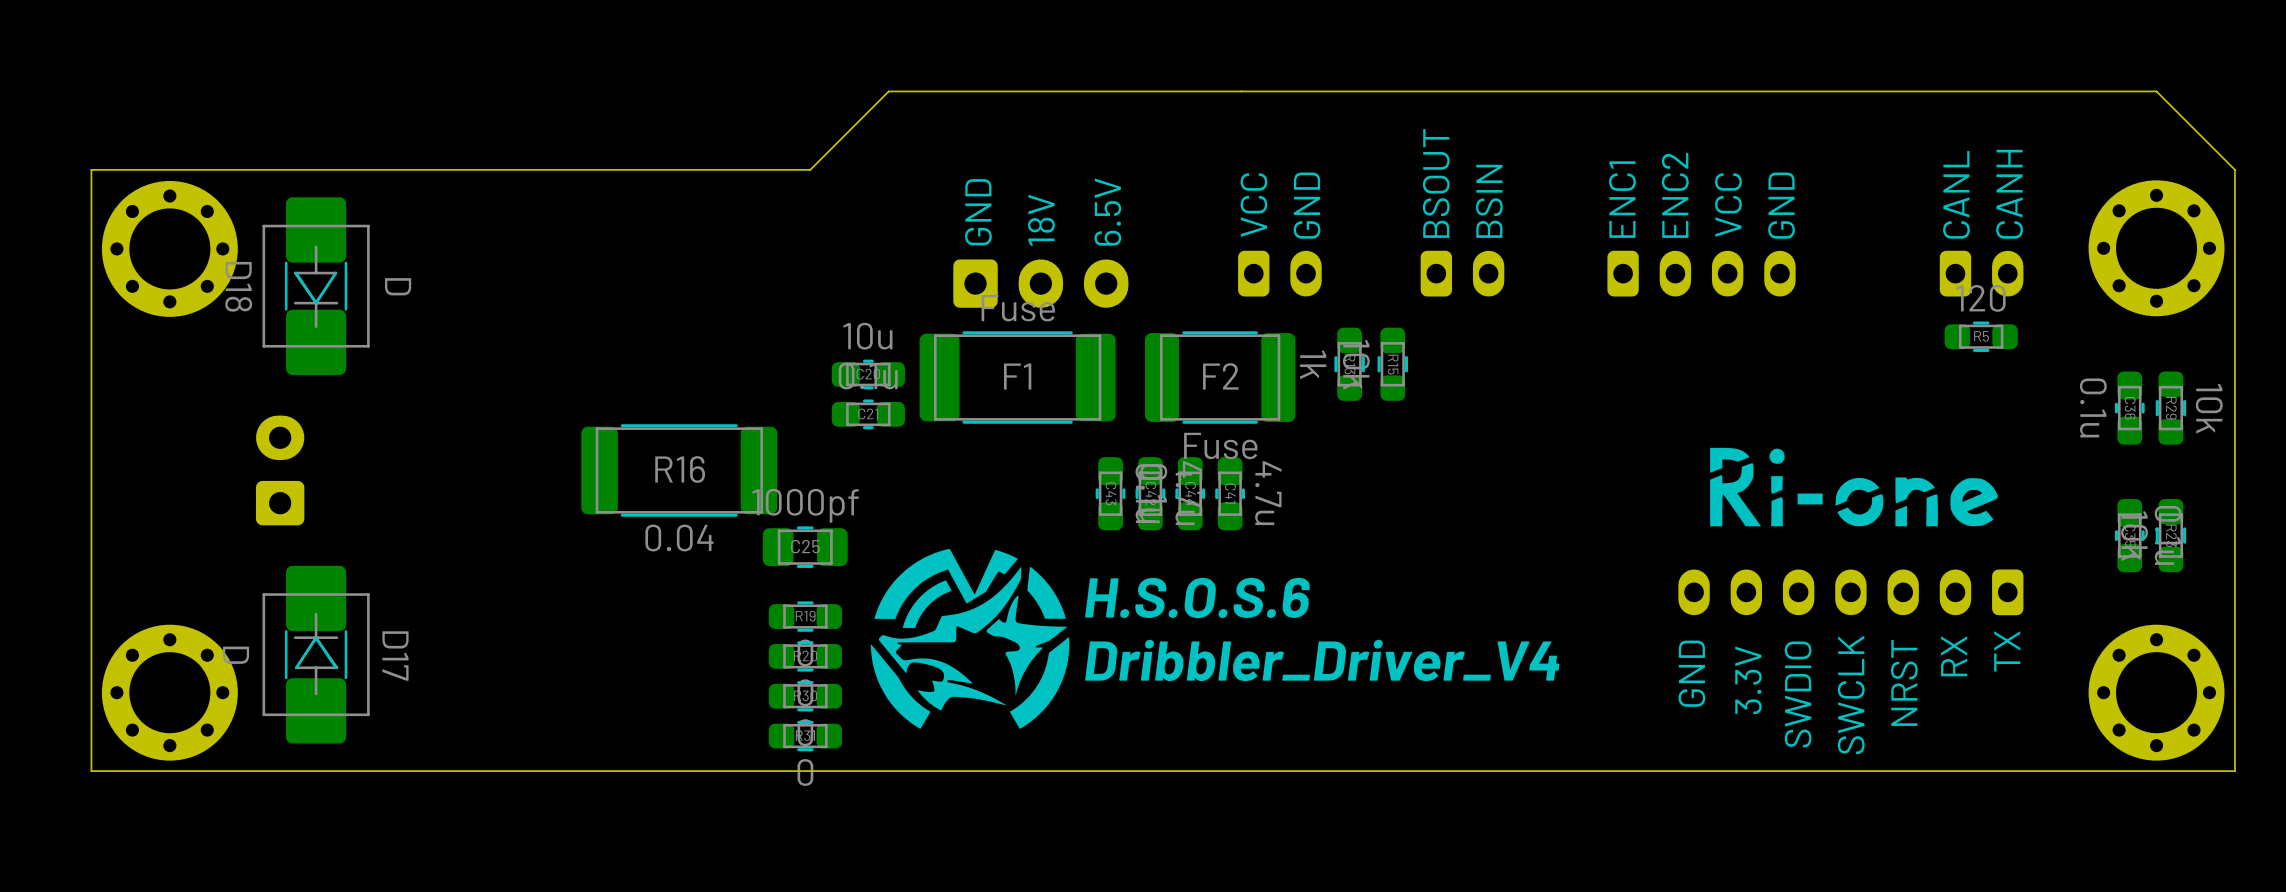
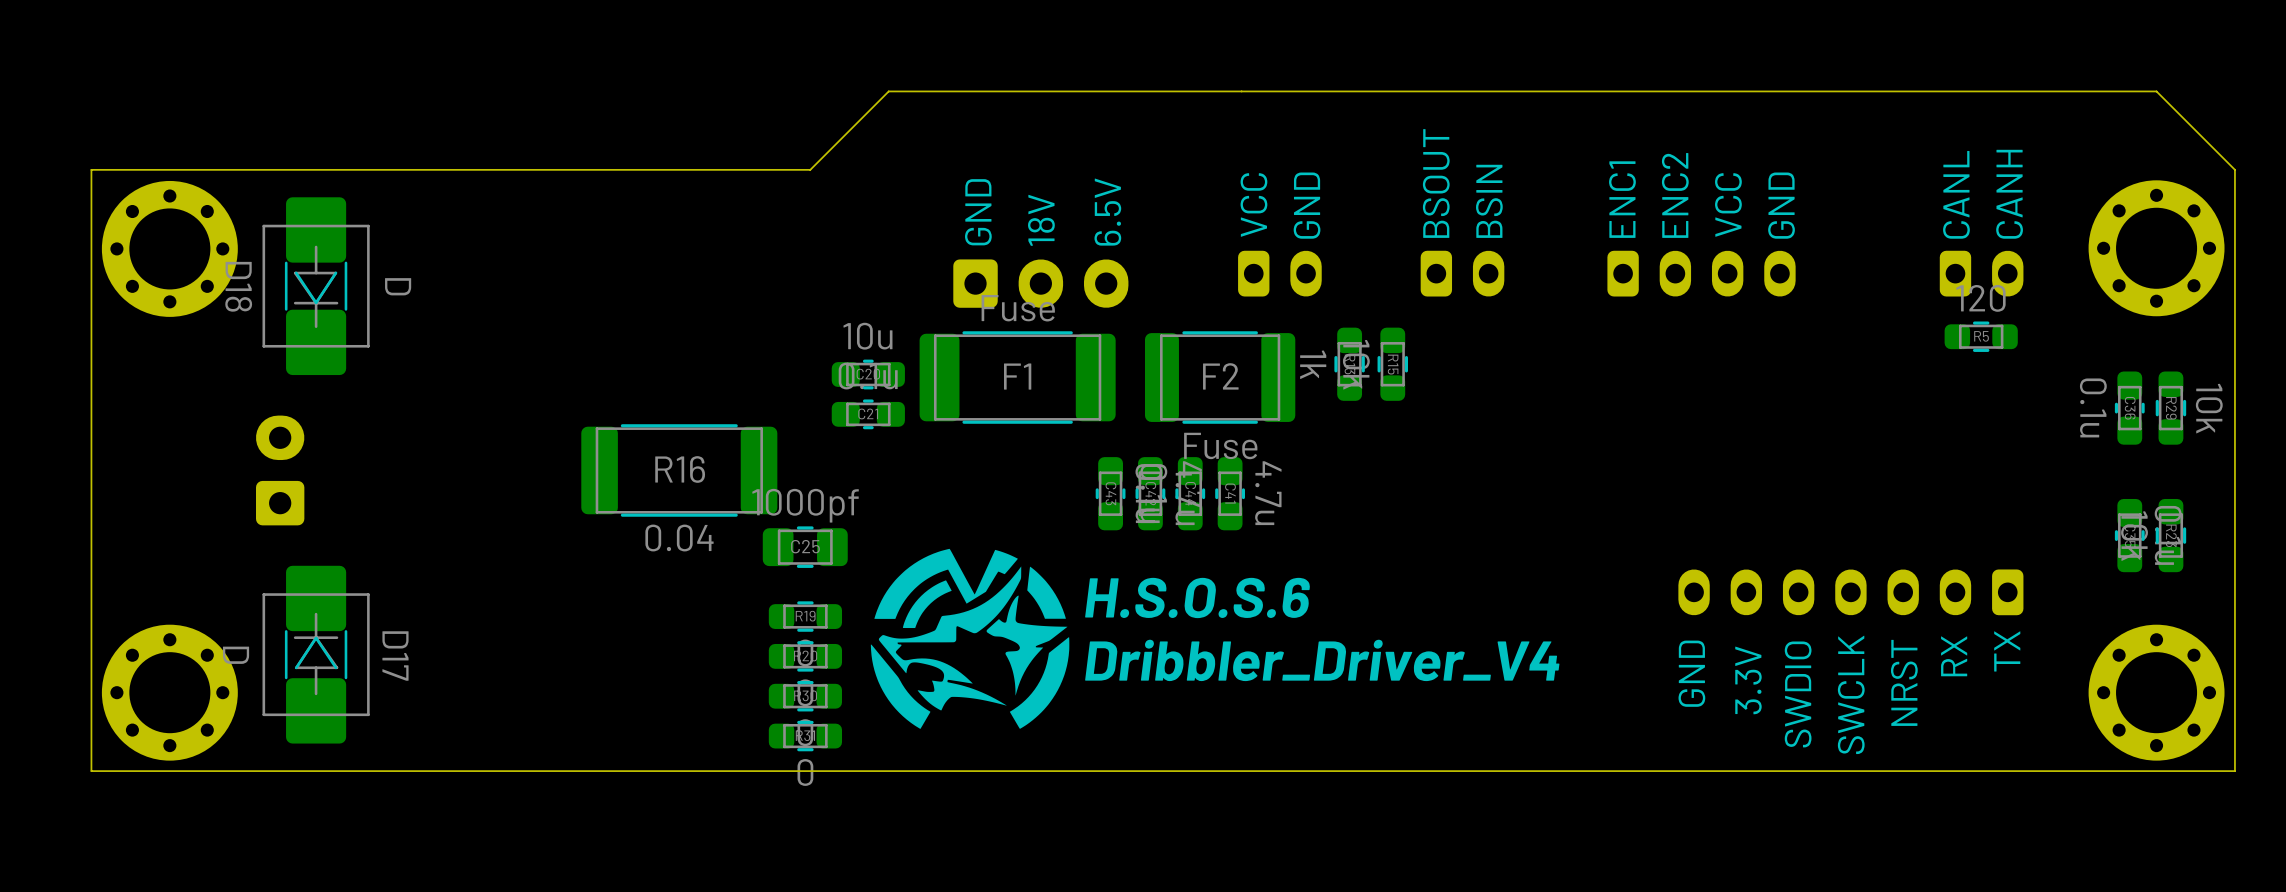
drawing: [1710, 447, 1998, 527] -> none

